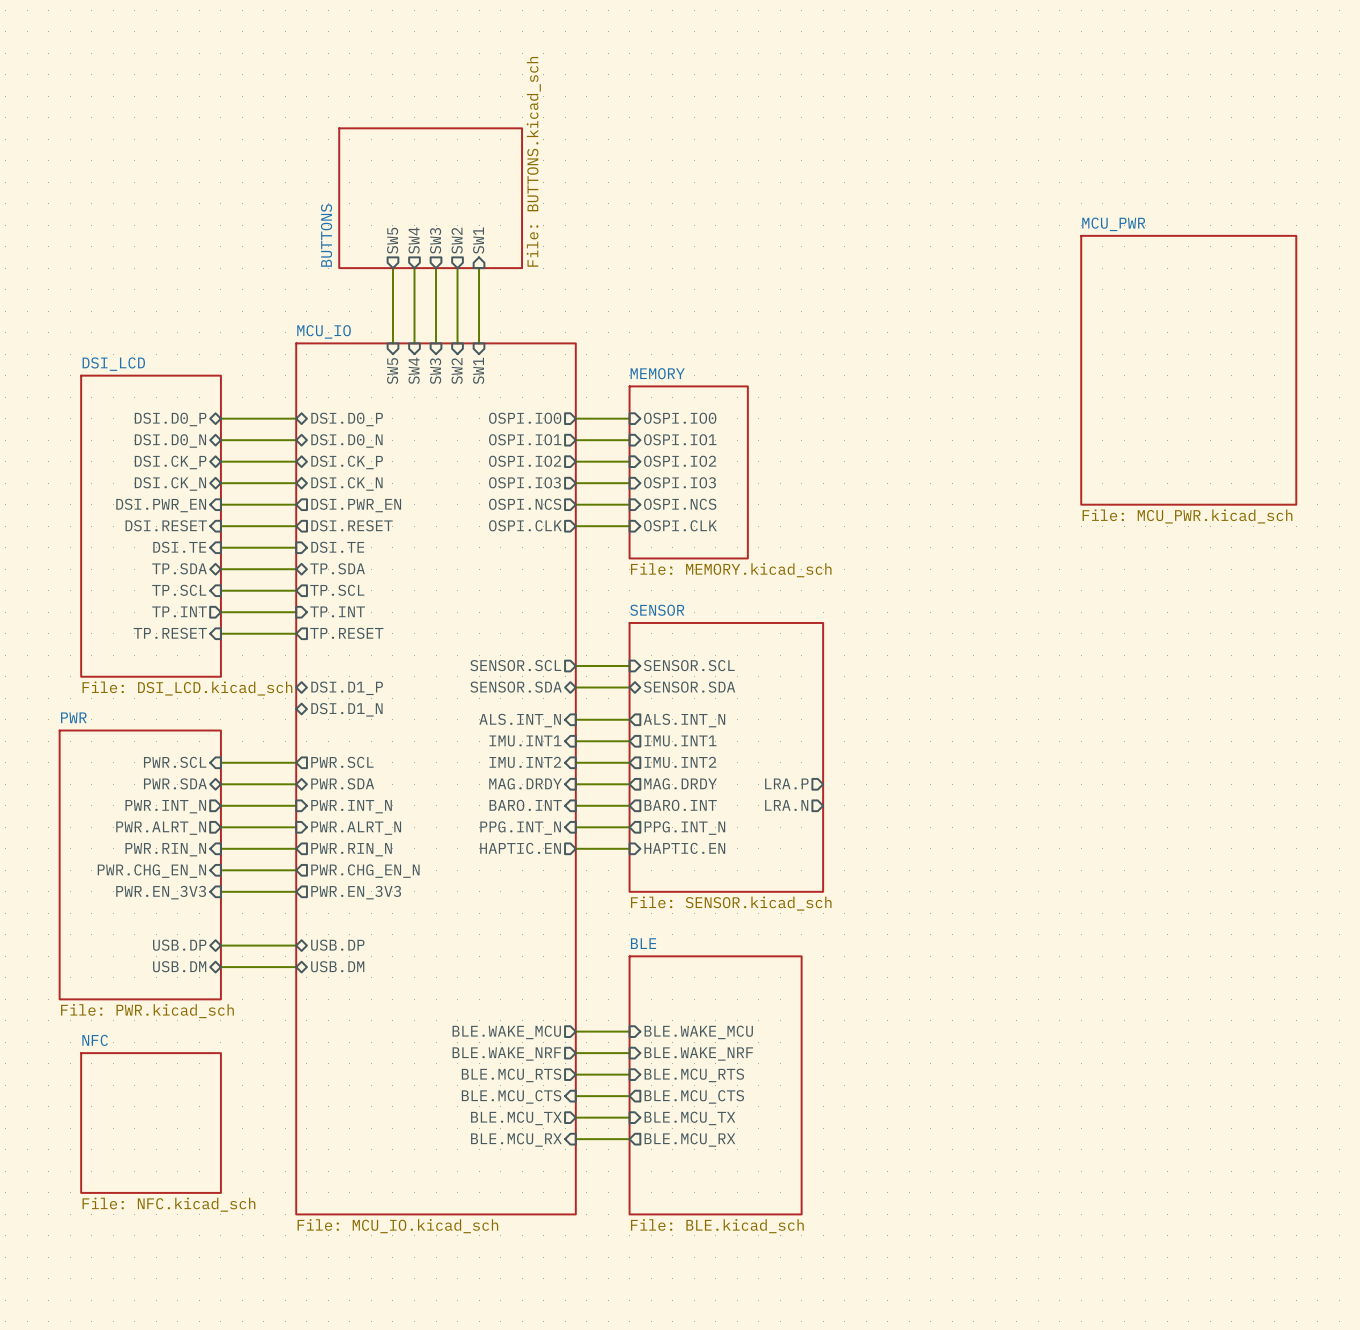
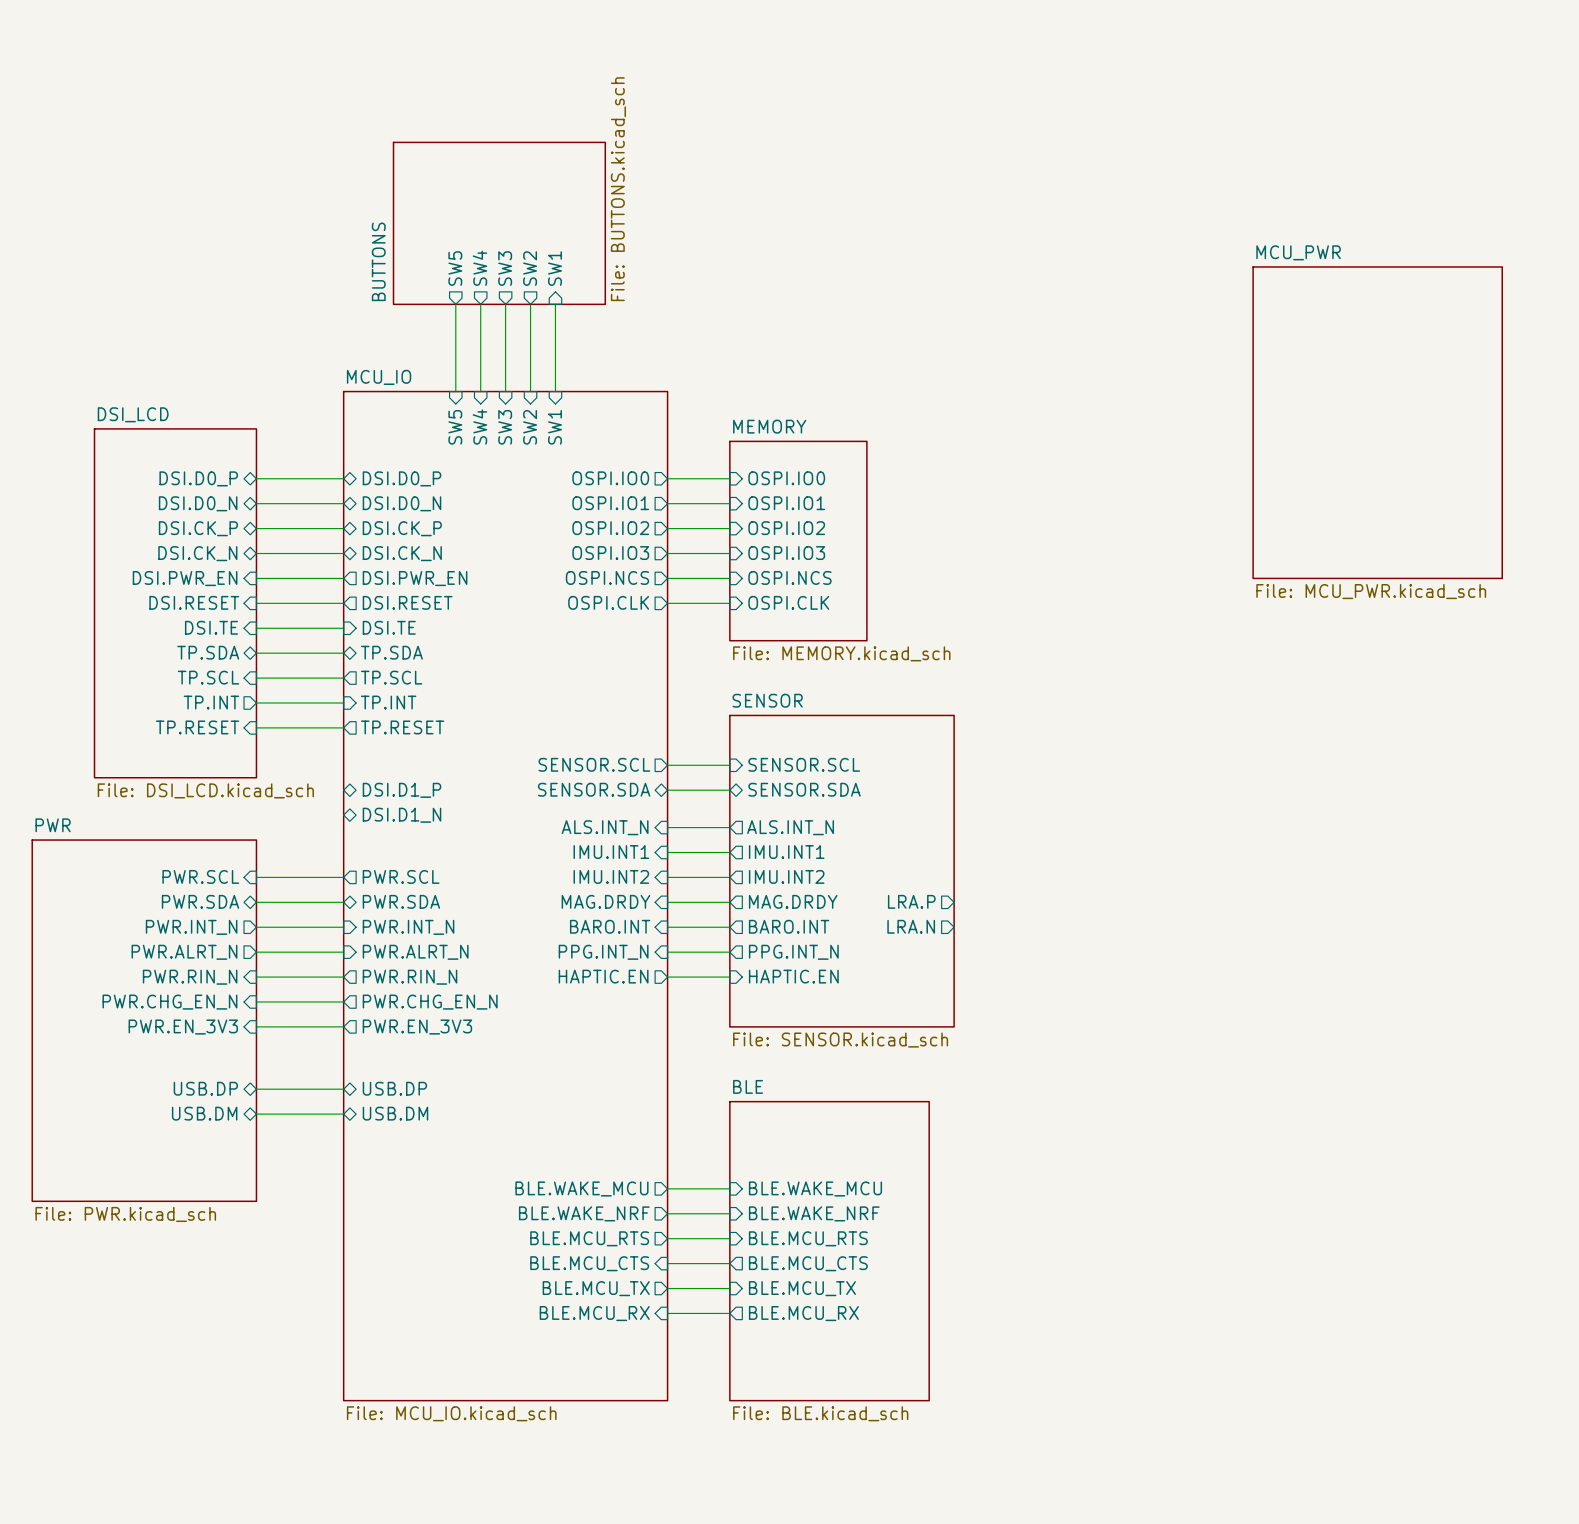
sheet PWR: File: PWR.kicad_sch (140, 864) -> none
sheet PWR: none -> File: PWR.kicad_sch (144, 1020)
sheet NFC: File: NFC.kicad_sch (151, 1123) -> none

